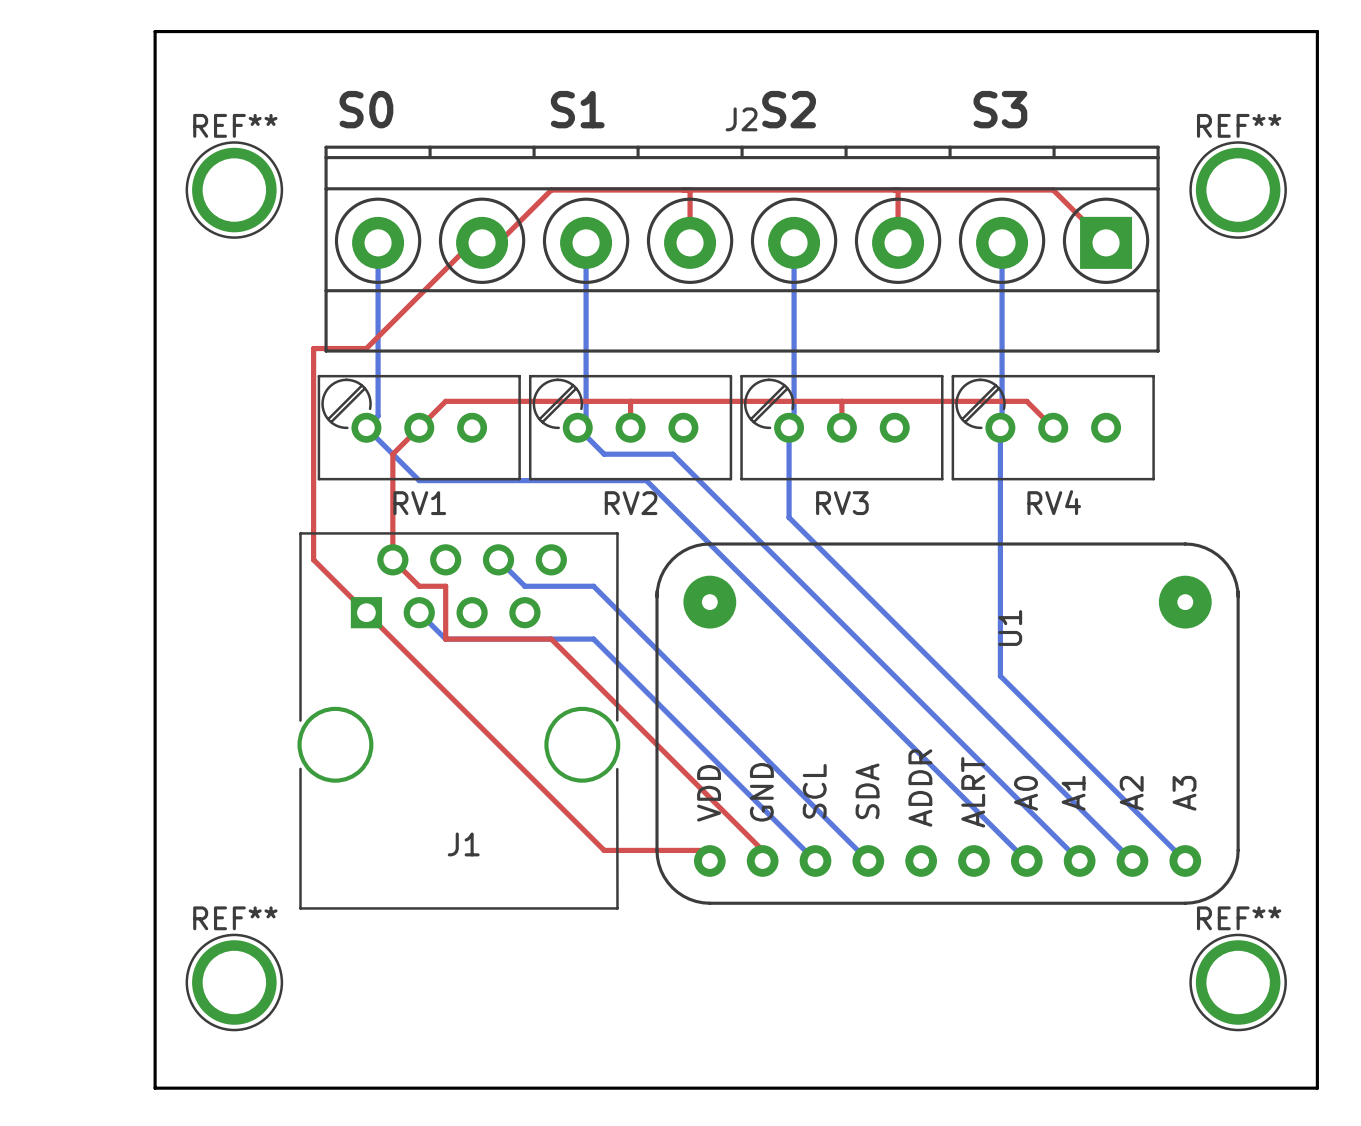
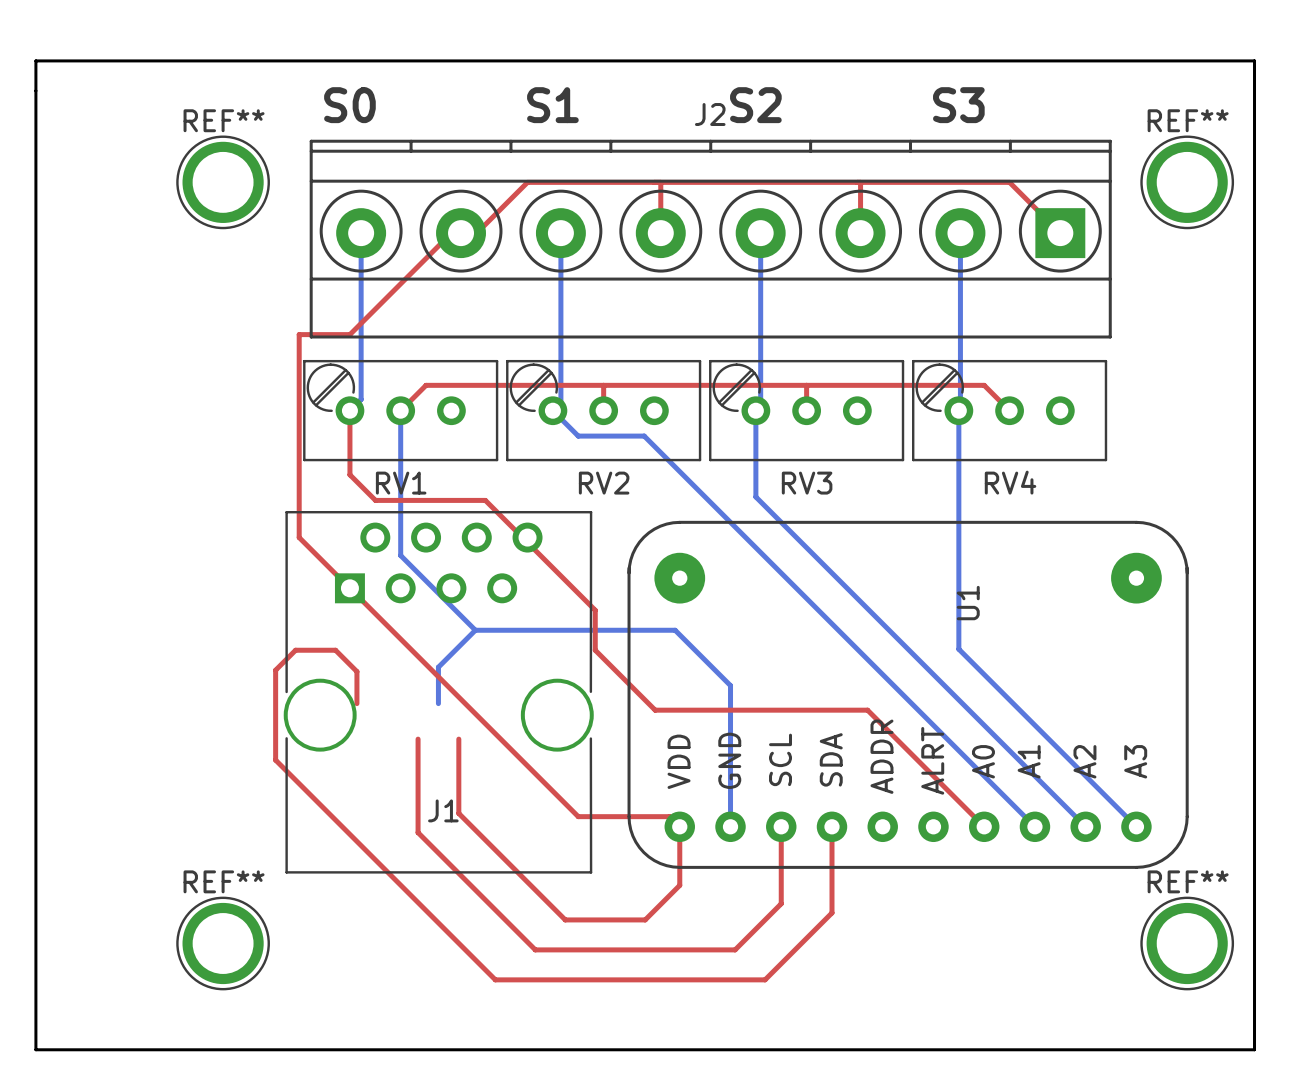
board edge: (155, 31) (155, 1088) (1317, 1088) (1317, 31) (155, 31) -> (35, 60) (35, 1049) (1254, 1049) (1254, 60) (35, 60)
top track: none -> (349, 410) (349, 474) (375, 500) (485, 500) (595, 610) (595, 650) (655, 710) (867, 710) (984, 826)
bottom track: (366, 427) (419, 480) (646, 480) (1026, 860) -> none
top track: (419, 427) (392, 454) (392, 559) (419, 586) (445, 586) (445, 639) (551, 639) (762, 850) -> none
bottom track: none -> (400, 410) (400, 555) (475, 630)
bottom track: (498, 559) (524, 586) (593, 586) (868, 860) -> none
bottom track: (419, 612) (445, 639) (593, 639) (815, 860) -> none
bottom track: none -> (475, 630) (438, 667) (438, 703)
bottom track: none -> (475, 630) (675, 630) (730, 685) (730, 826)
top track: none -> (356, 703) (356, 671) (335, 650) (295, 650) (275, 670) (275, 760) (495, 979) (765, 979) (831, 912) (831, 826)
top track: none -> (418, 739) (418, 832) (535, 949) (735, 949) (781, 903) (781, 826)
top track: none -> (458, 739) (458, 813) (565, 919) (645, 919) (679, 885) (679, 826)

